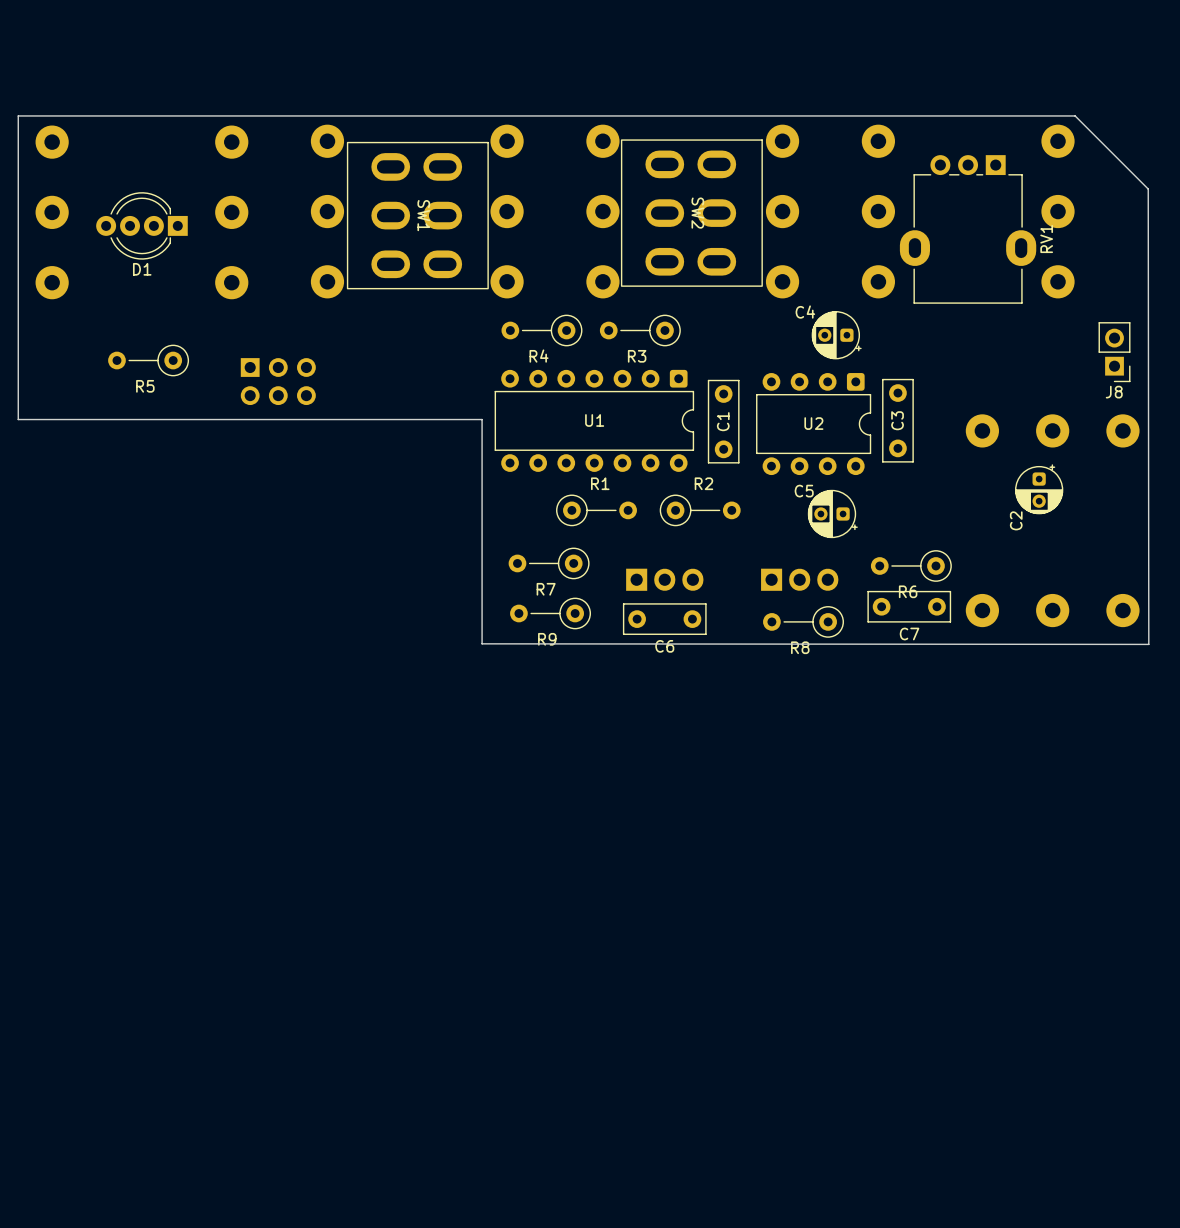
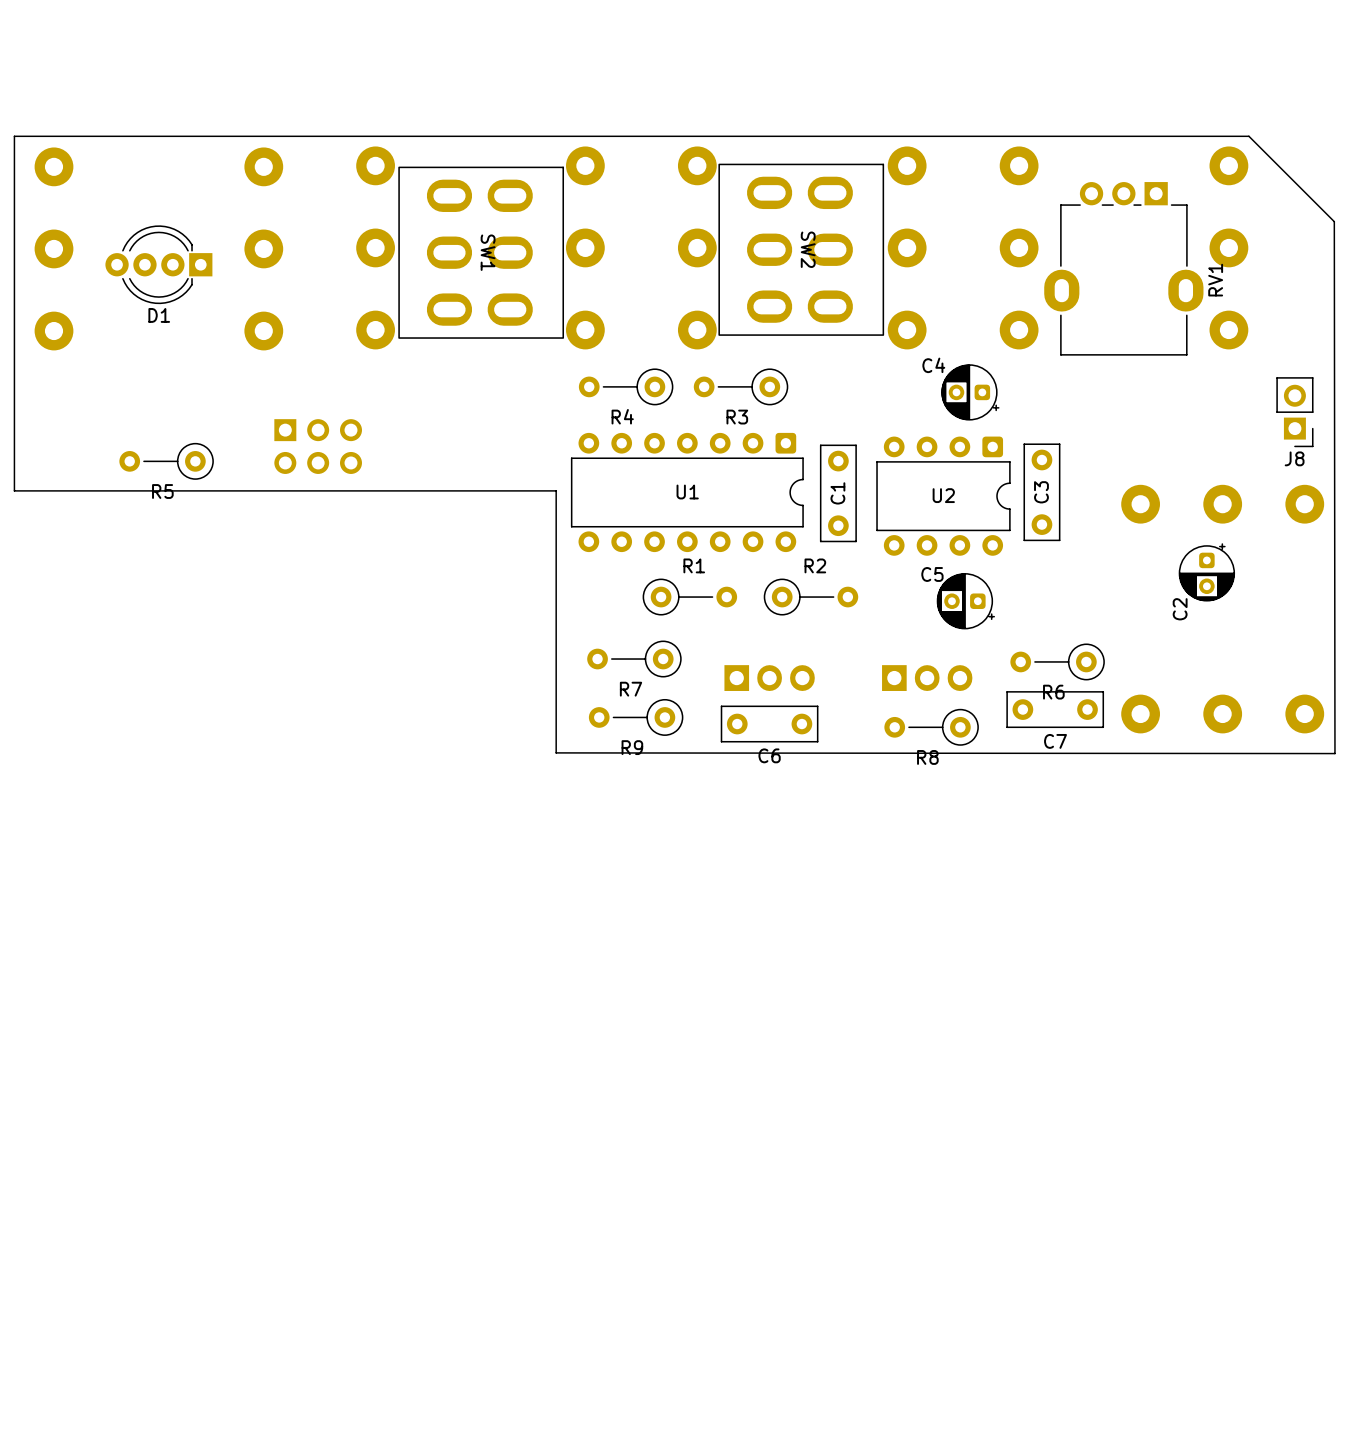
R5 position: (148, 360) -> (166, 461)

